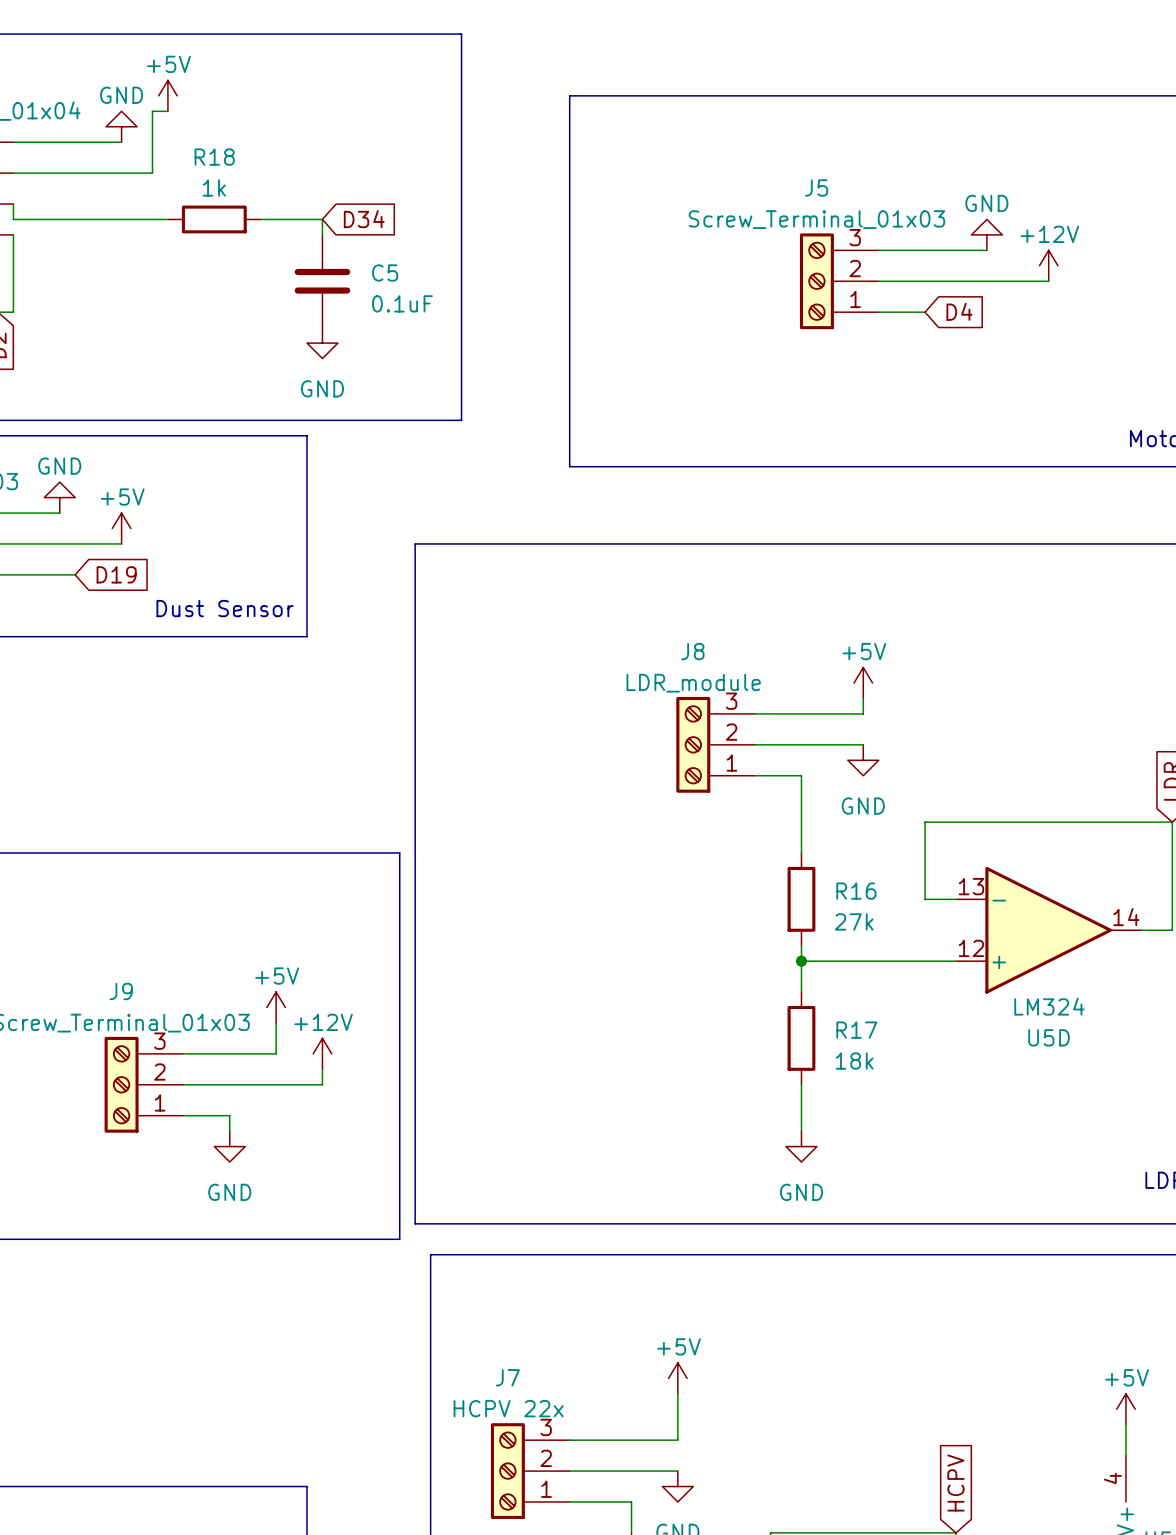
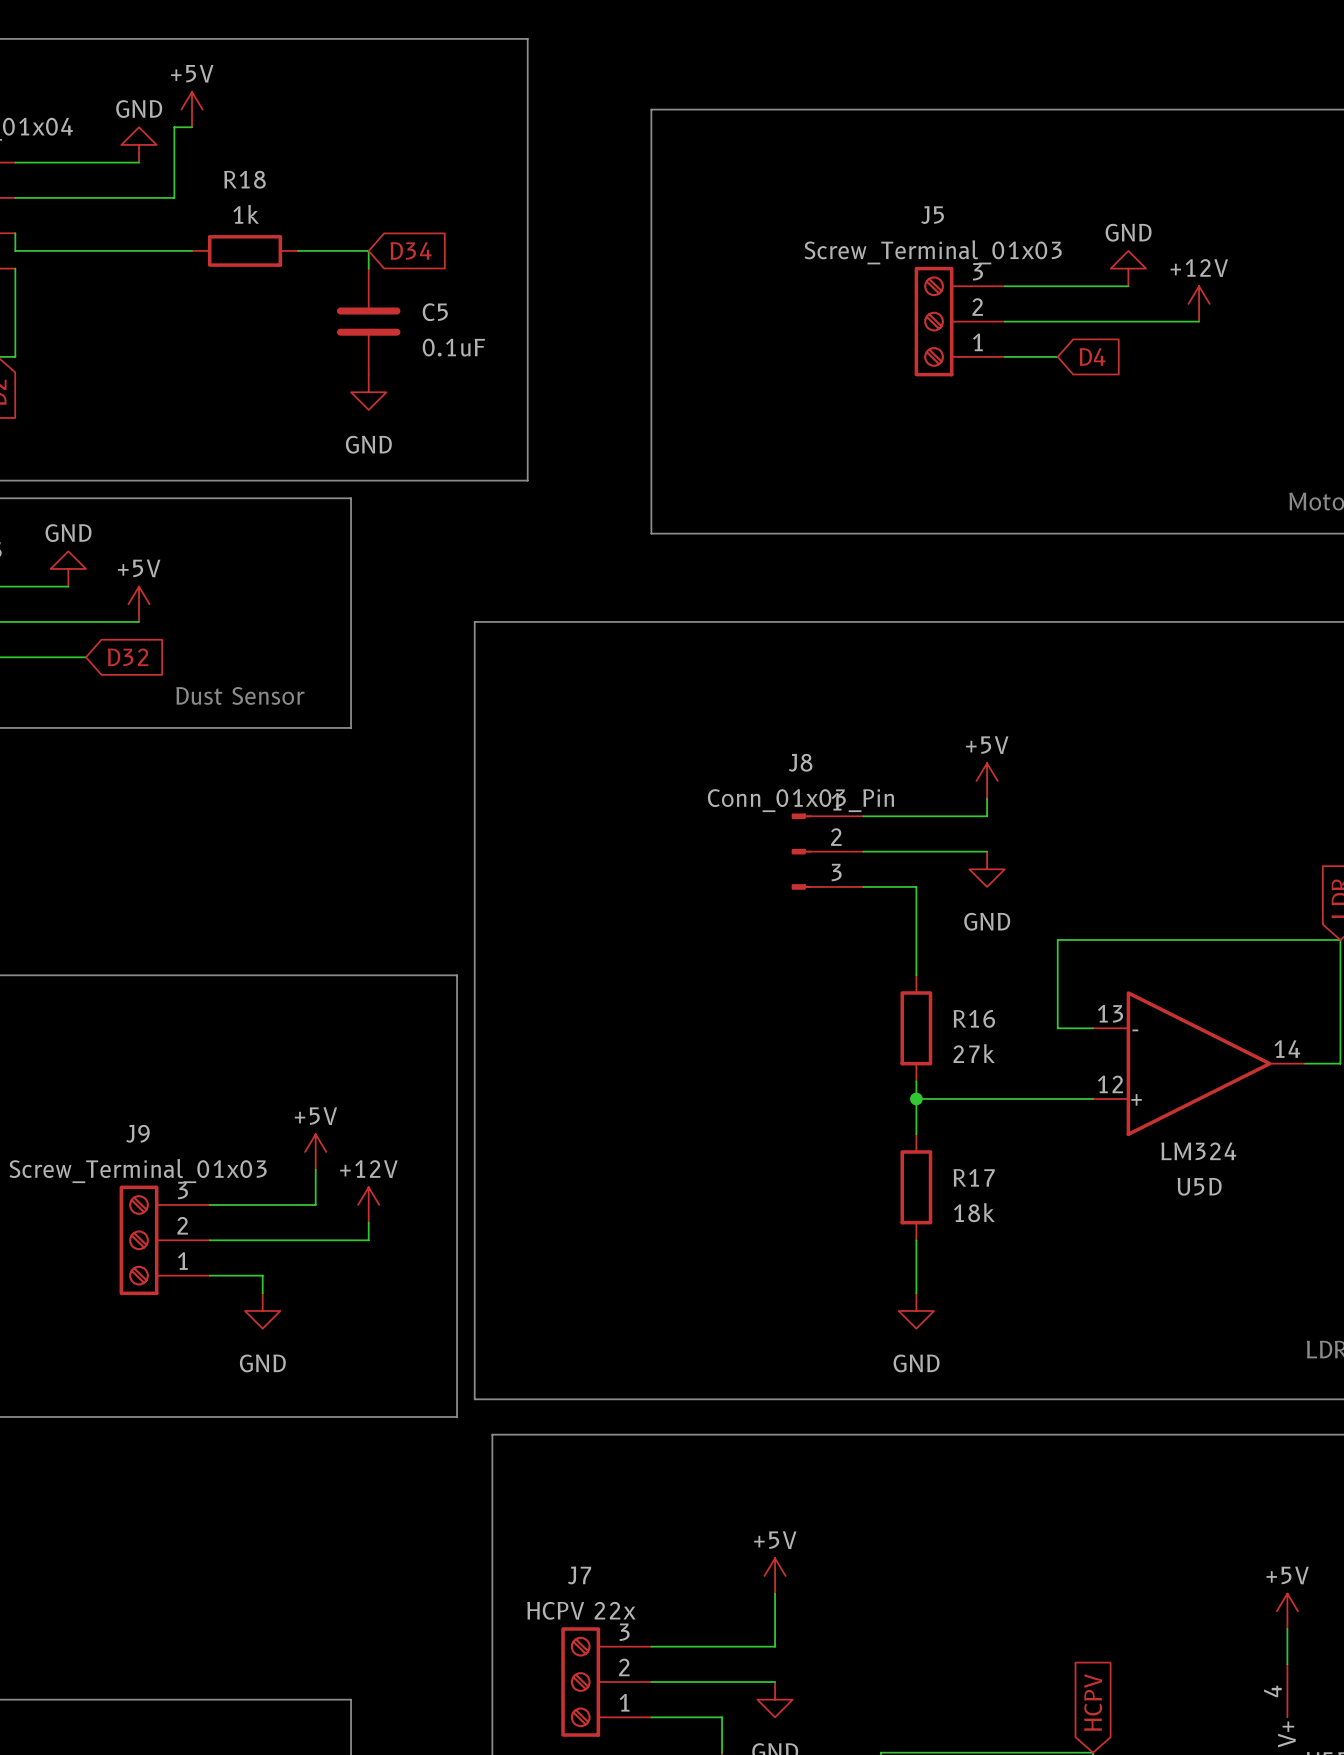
global label: D19 (116, 574) -> D32 (128, 657)
J8 value: LDR_module (693, 683) -> Conn_01x03_Pin (800, 800)
J8 symbol: [676, 696, 756, 793] -> [791, 813, 864, 890]

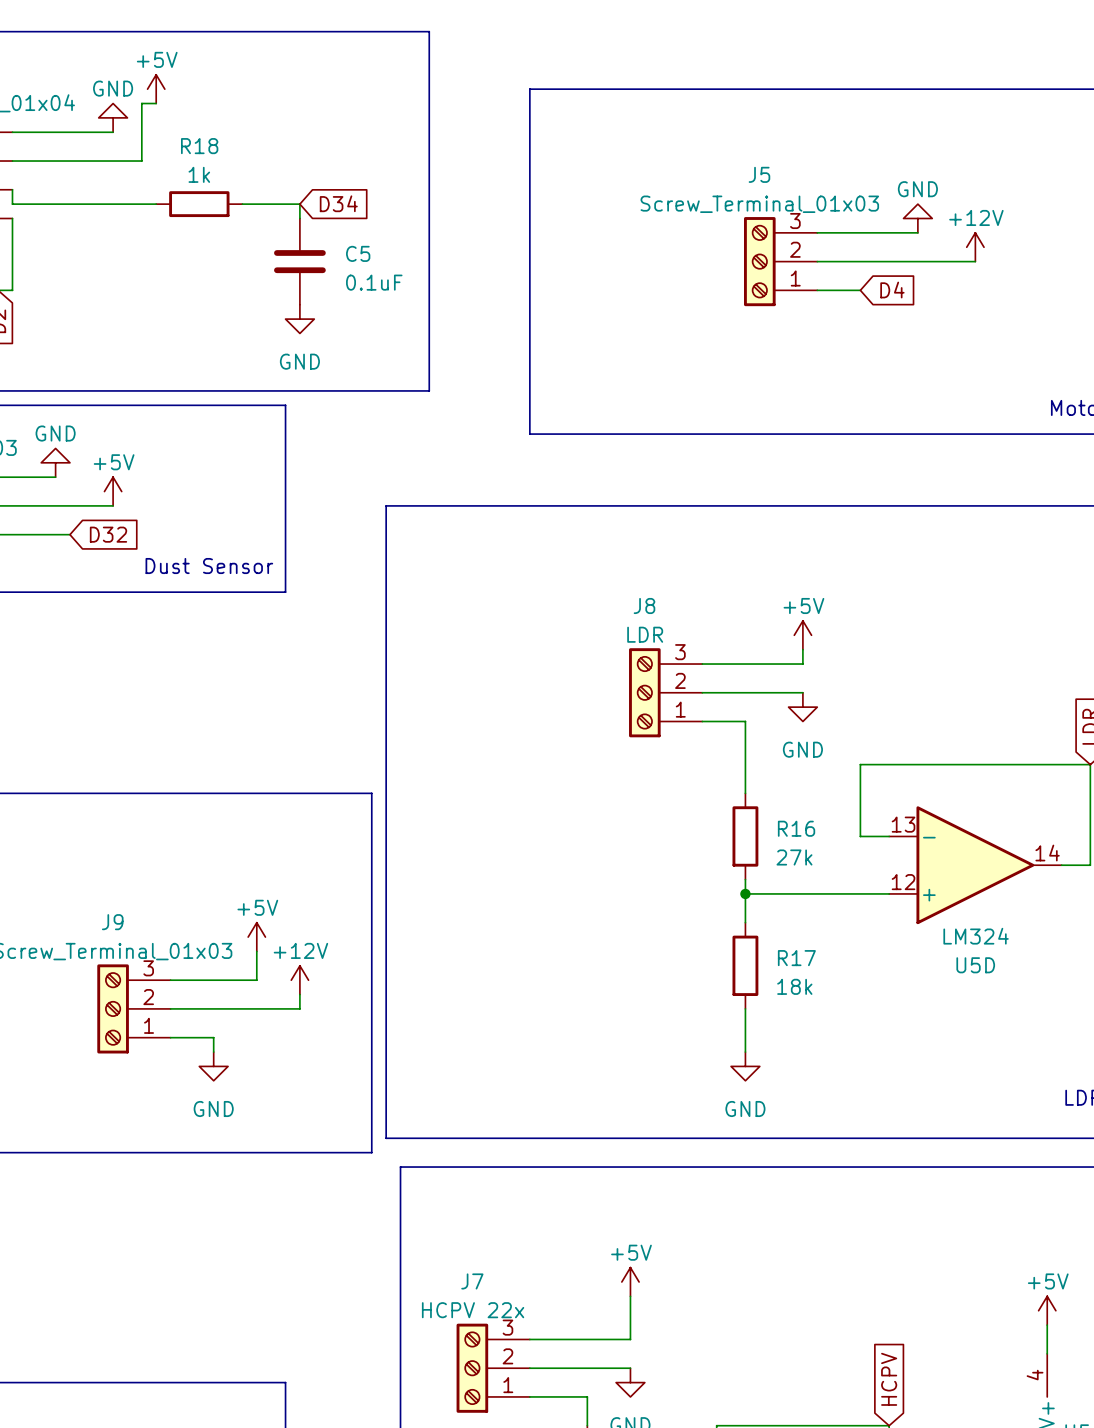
J8 value: Conn_01x03_Pin (800, 800) -> LDR (645, 634)
J8 symbol: [791, 813, 864, 890] -> [629, 648, 703, 738]

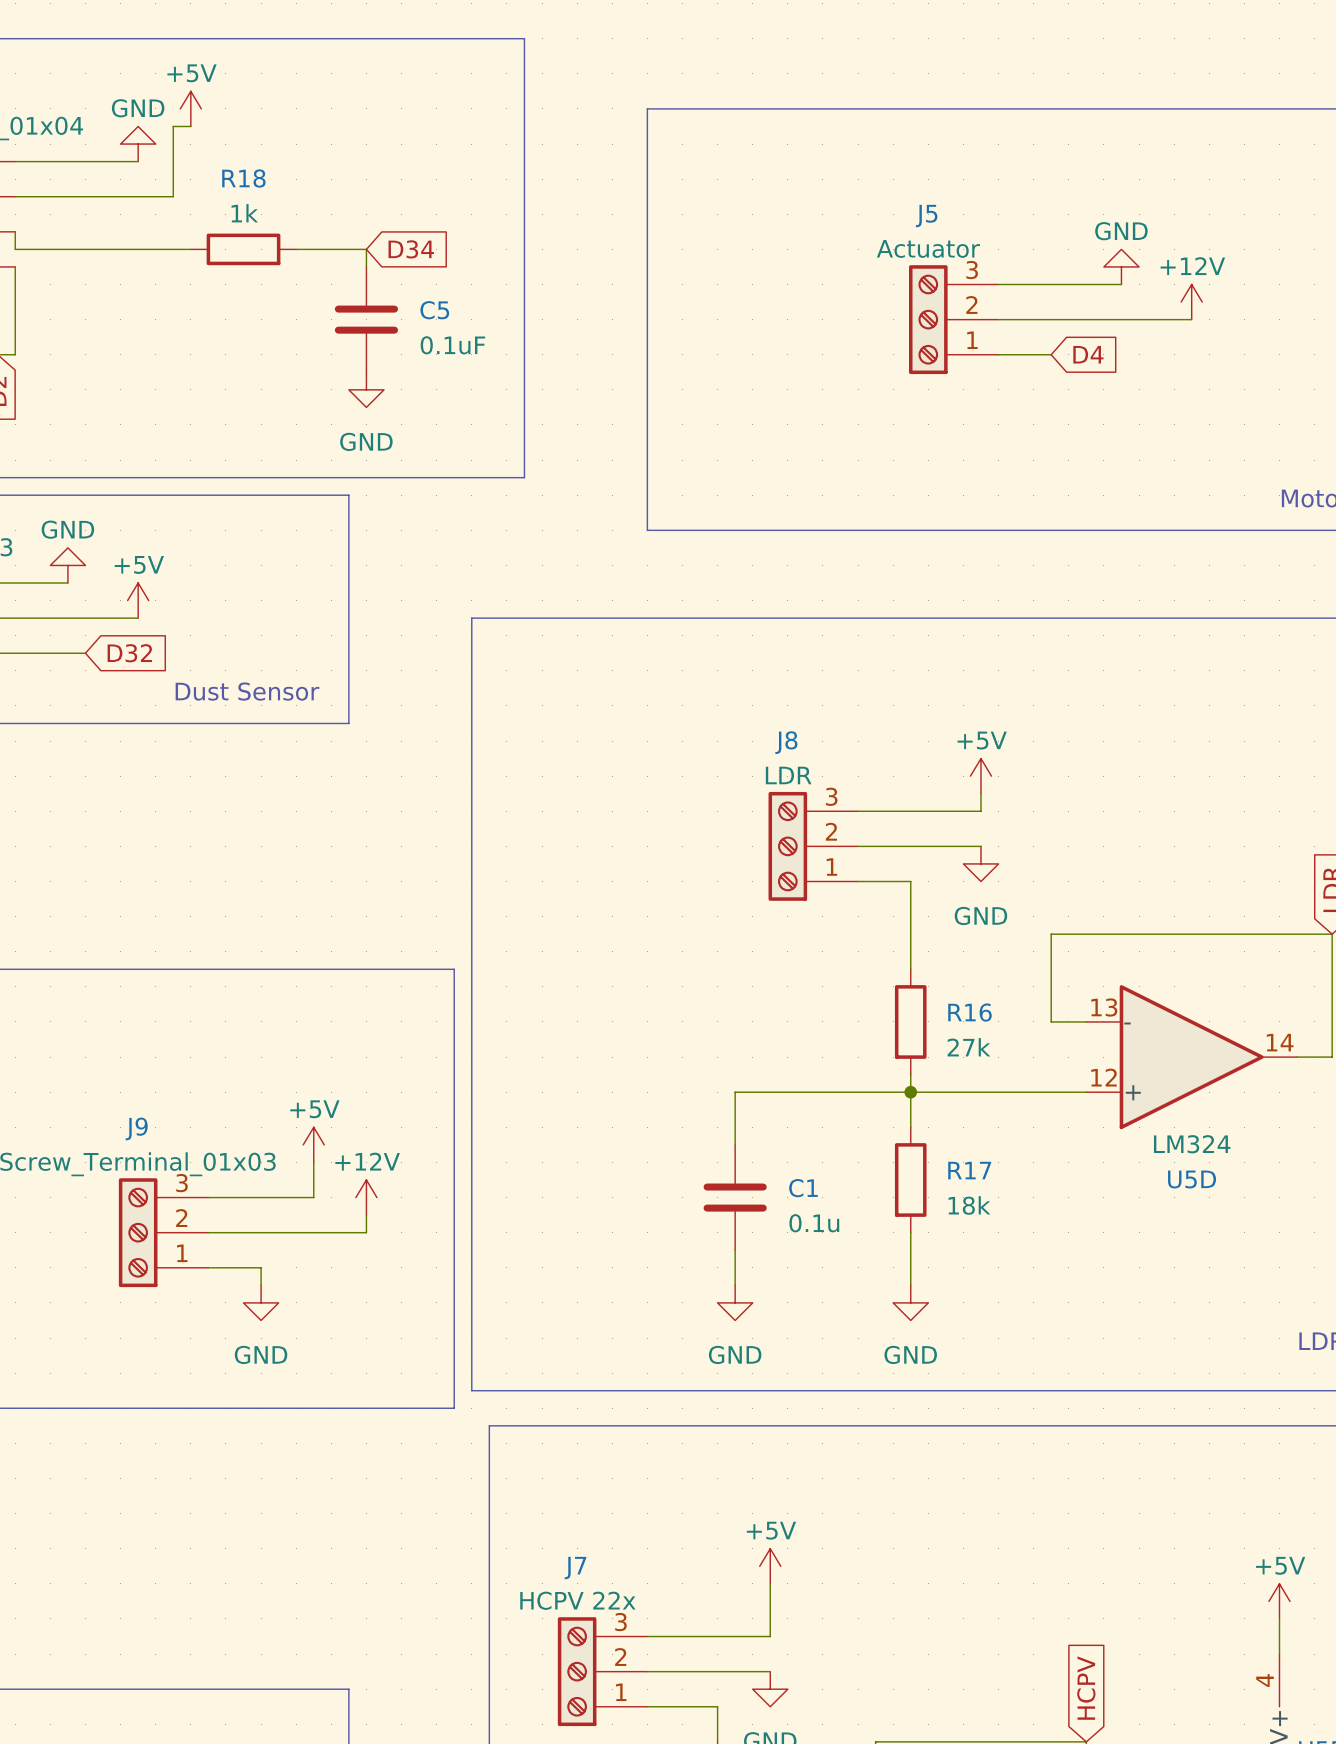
J5 value: Screw_Terminal_01x03 (759, 204) -> Actuator (928, 248)
wire: none -> (910, 1092) (735, 1092) (735, 1144)
C1: none -> 0.1u (735, 1197)
wire: none -> (735, 1250) (735, 1285)
power symbol: none -> GND (735, 1302)

